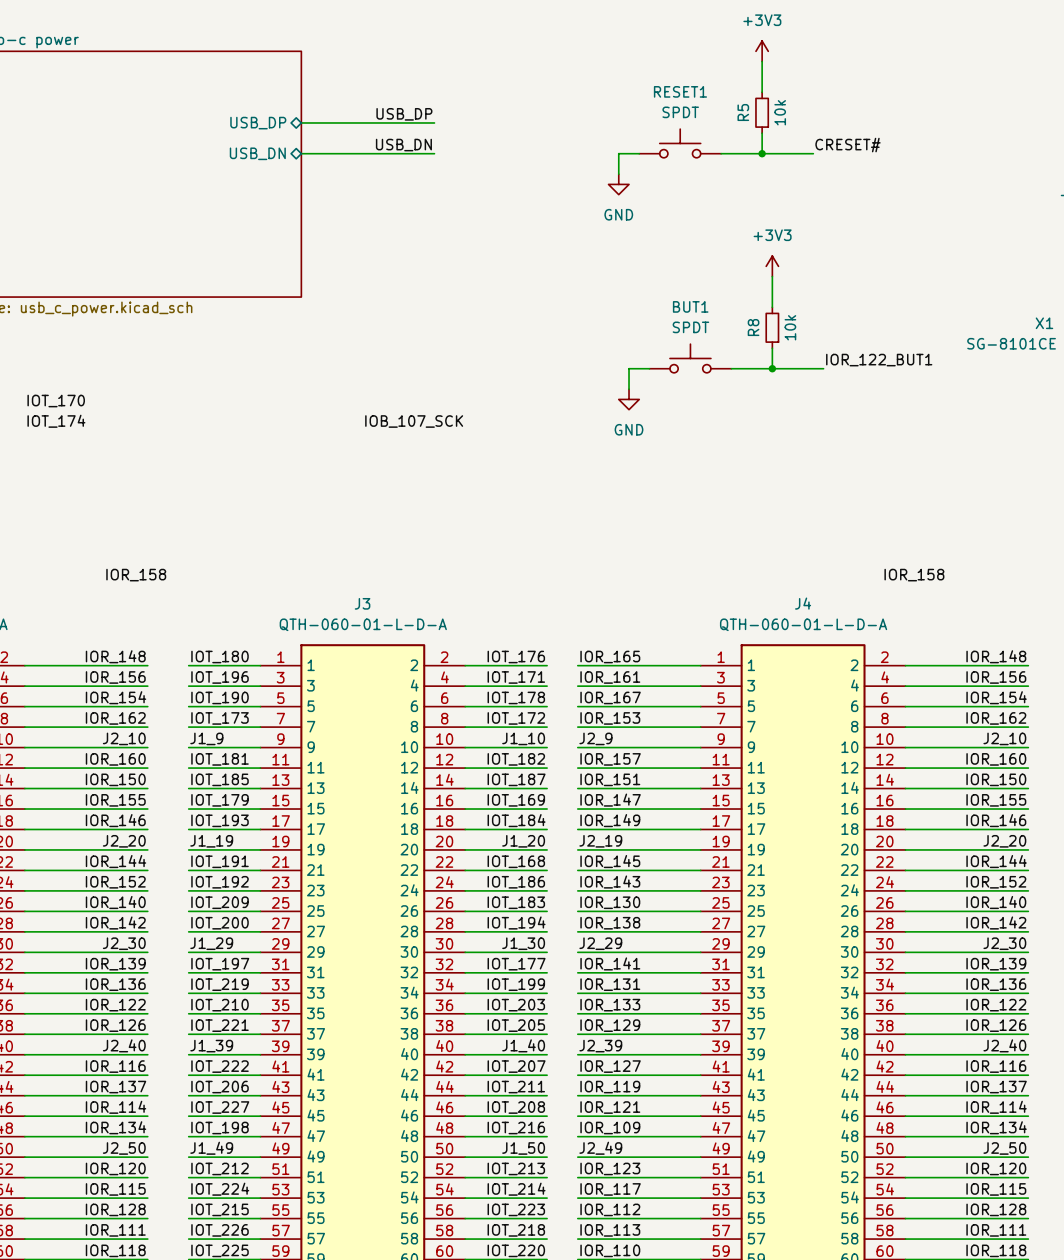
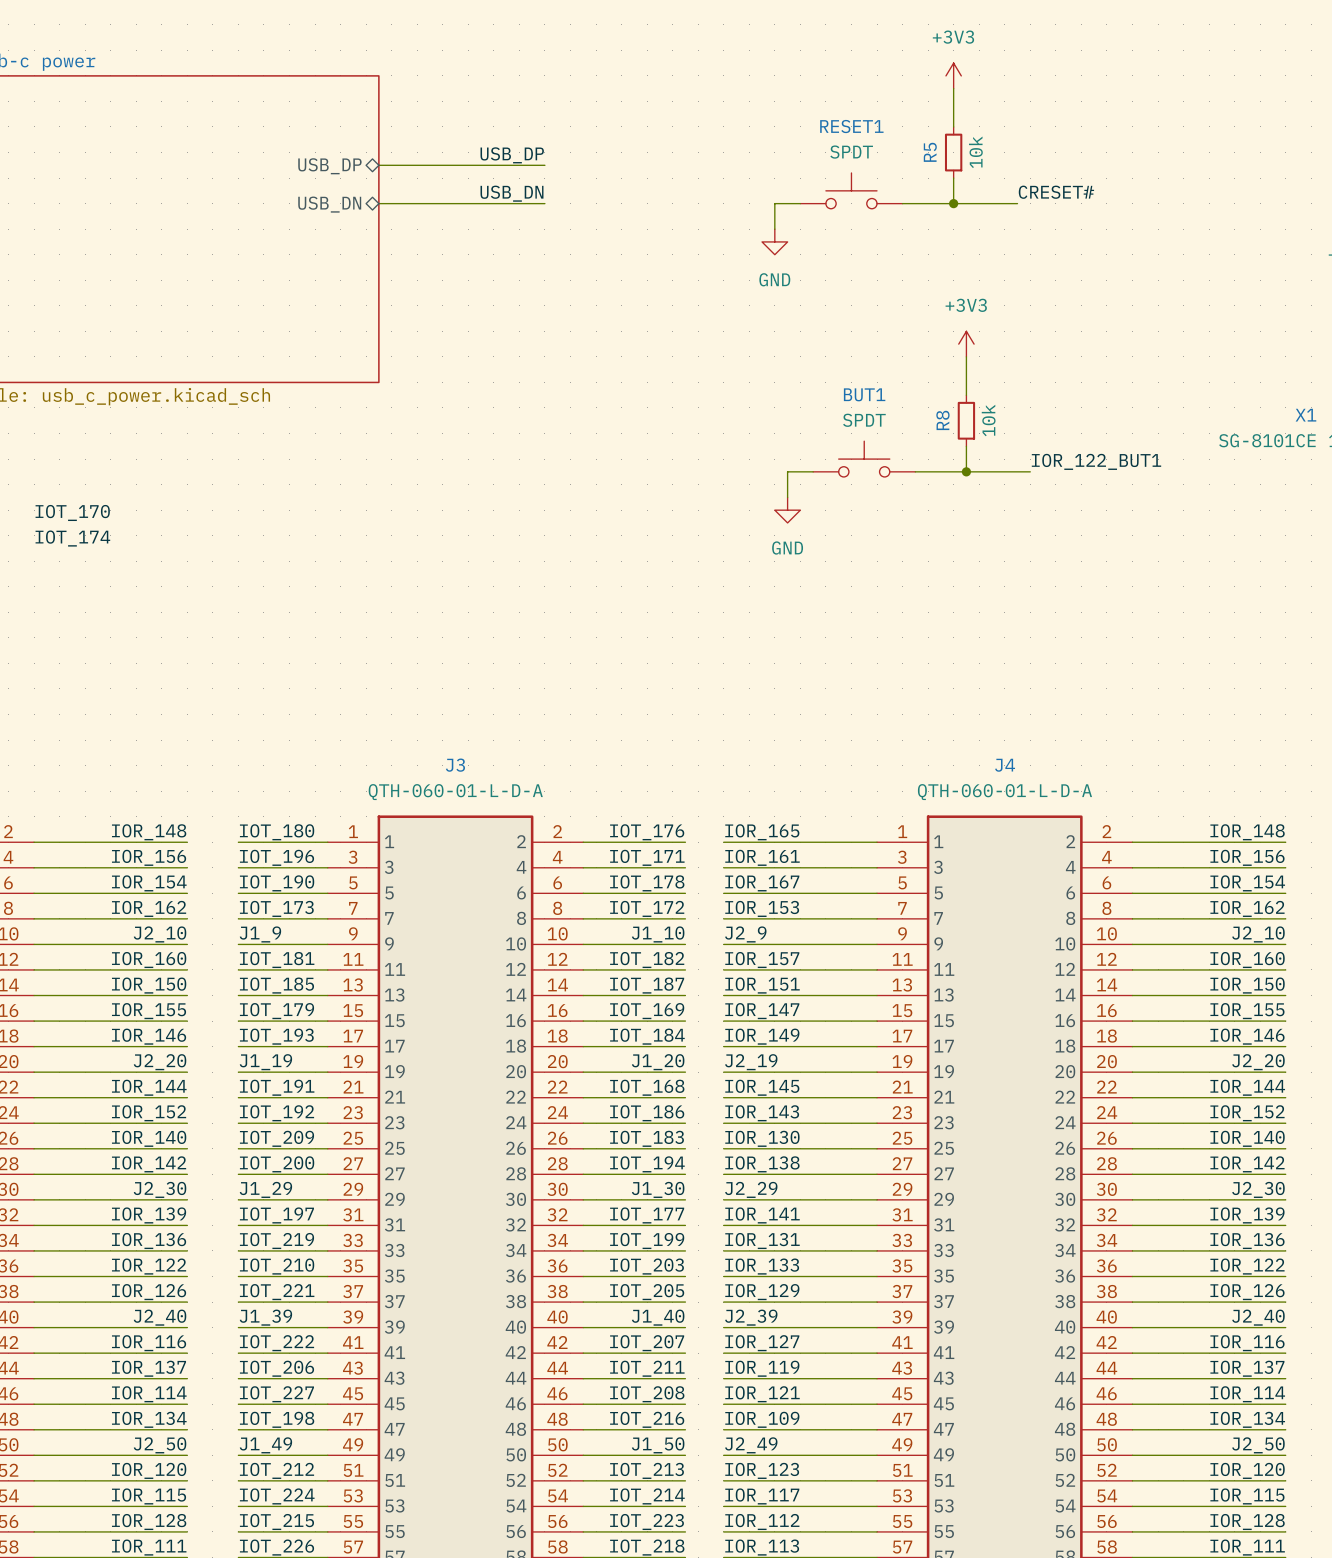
label: IOB_107_SCK (414, 421) -> none
label: IOR_158 (136, 575) -> none
label: IOR_158 (914, 575) -> none

